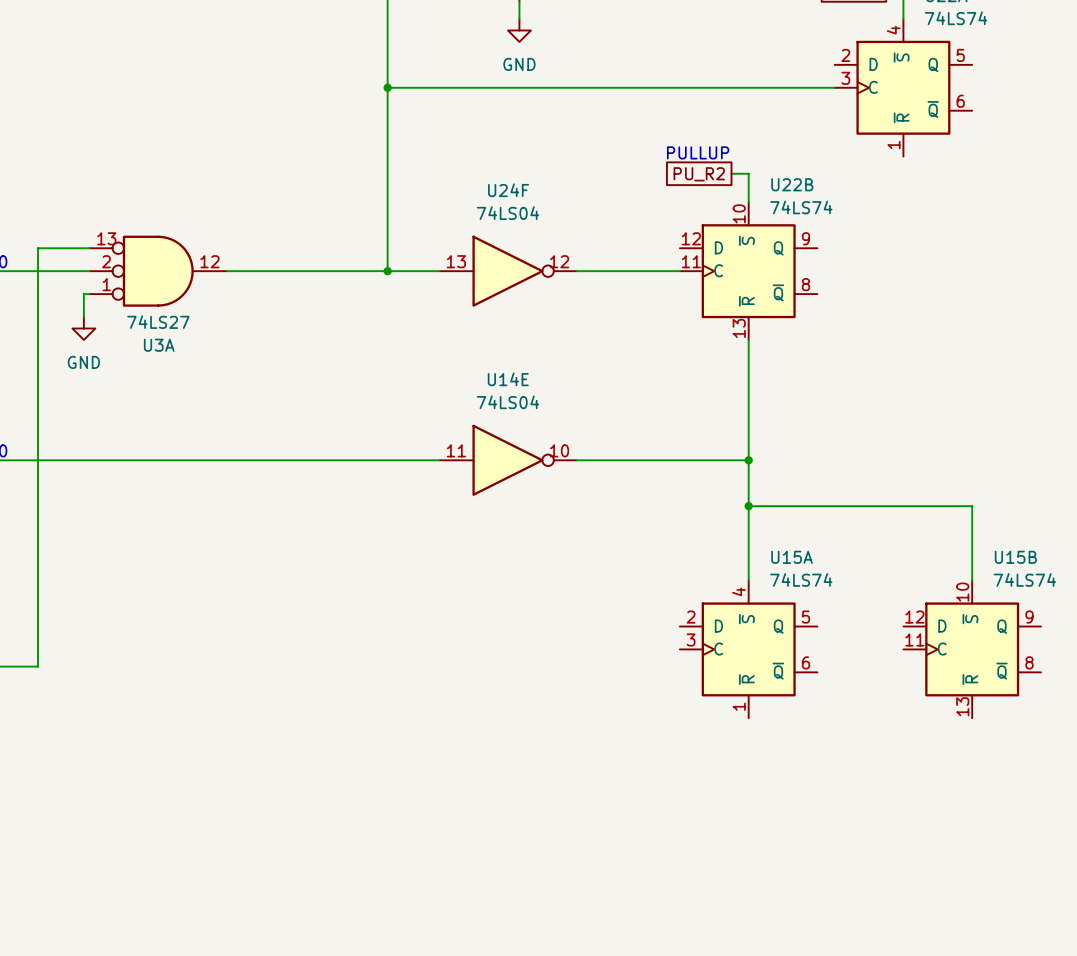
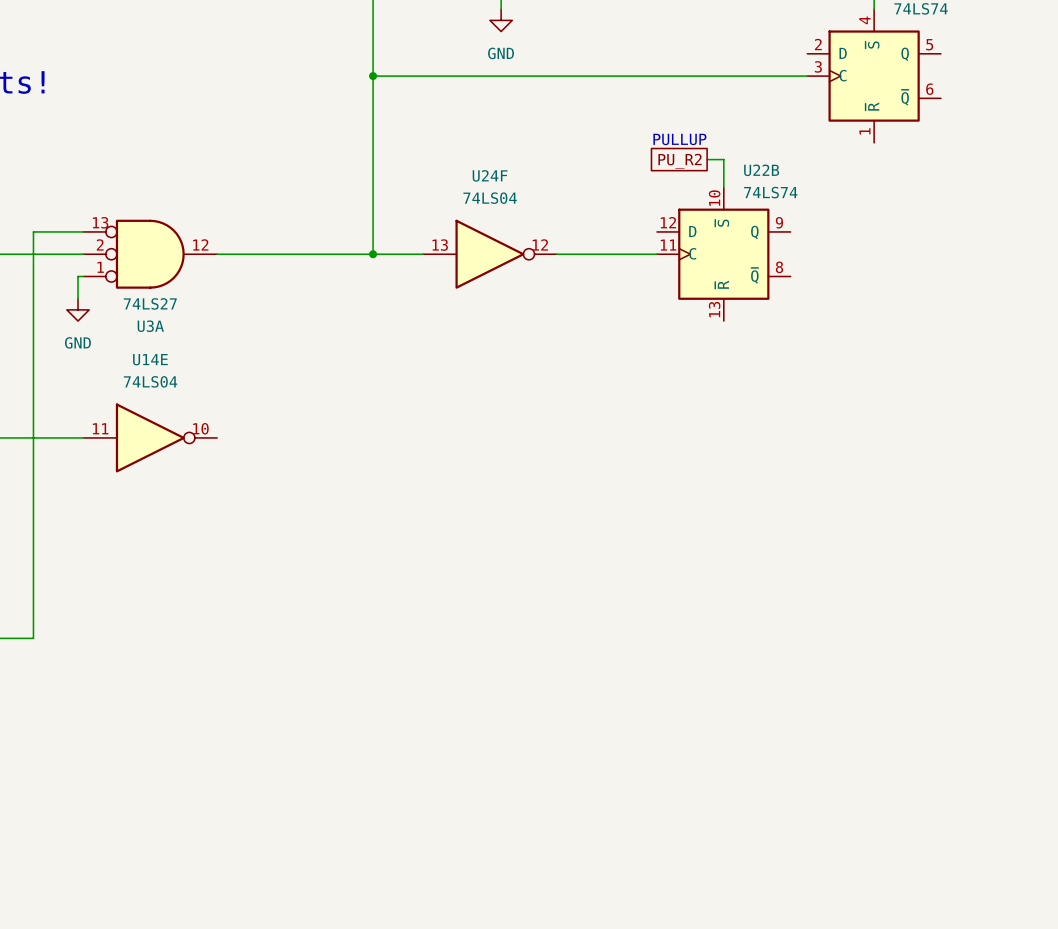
wire: (748, 339) (748, 580) -> none
wire: (89, 460) (439, 460) -> none
U14E position: (507, 460) -> (150, 437)
wire: (576, 460) (748, 460) -> none
junction: (748, 460) -> none
wire: (748, 506) (972, 506) (972, 580) -> none
junction: (748, 506) -> none
U15A: 74LS74 (748, 649) -> none
U15B: 74LS74 (972, 649) -> none

